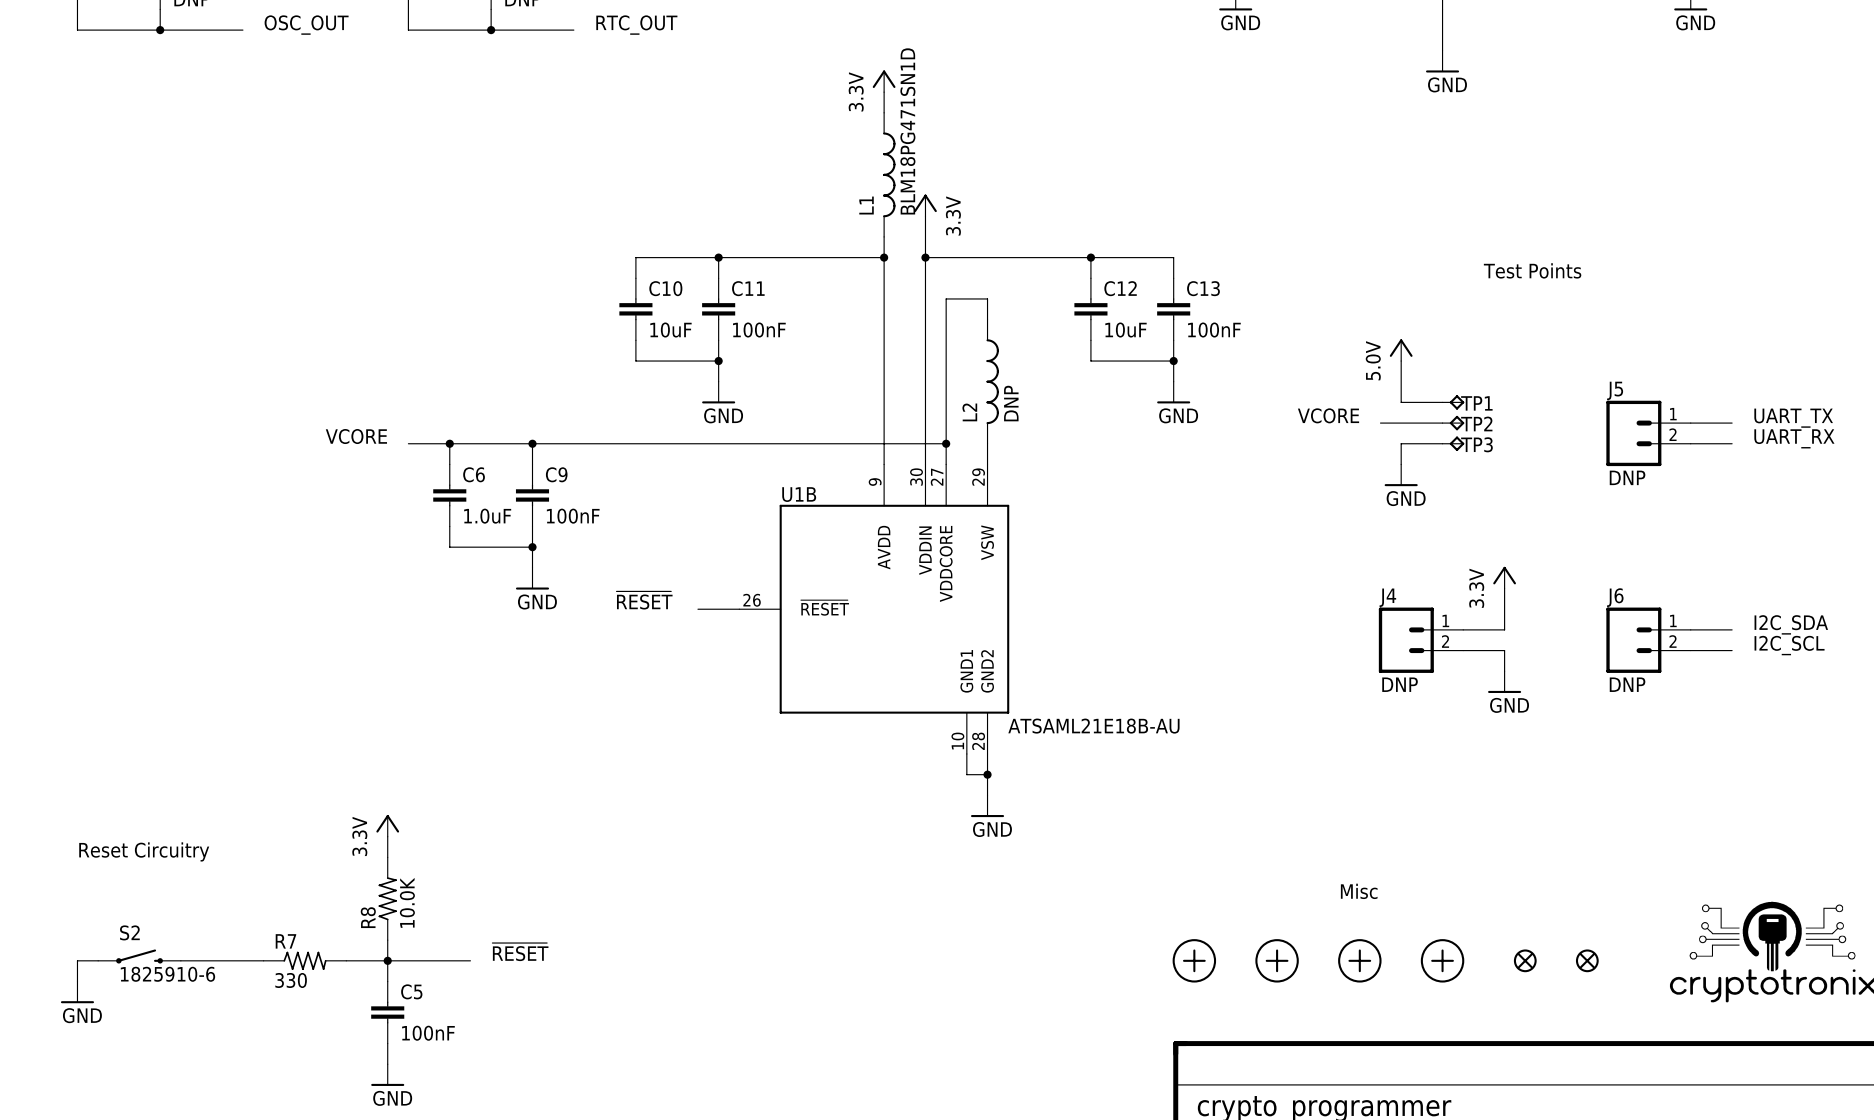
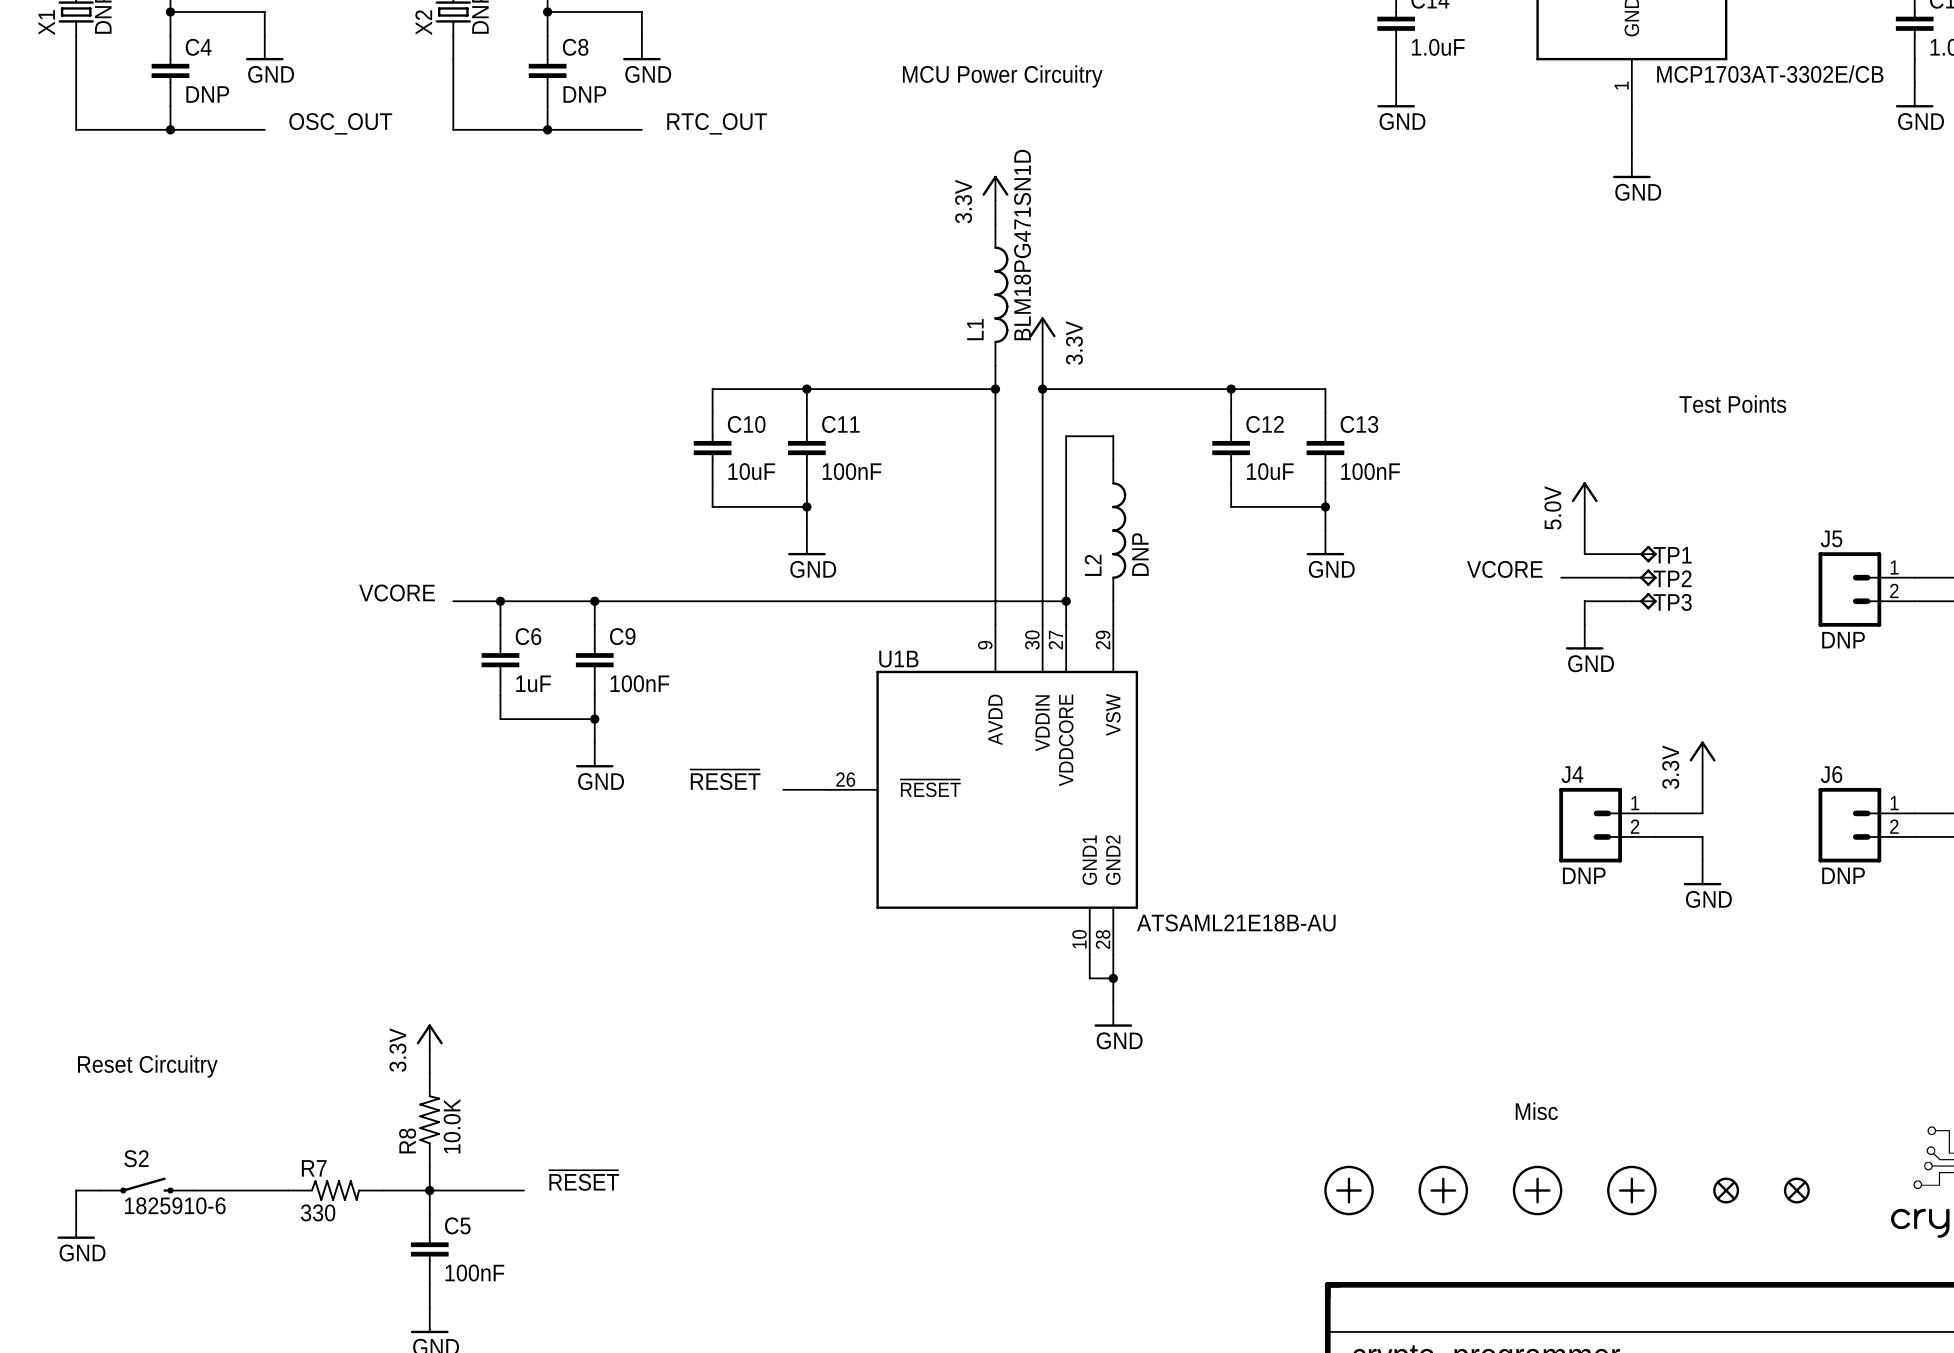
C6 value: 1.0uF (487, 516) -> 1uF (533, 683)

